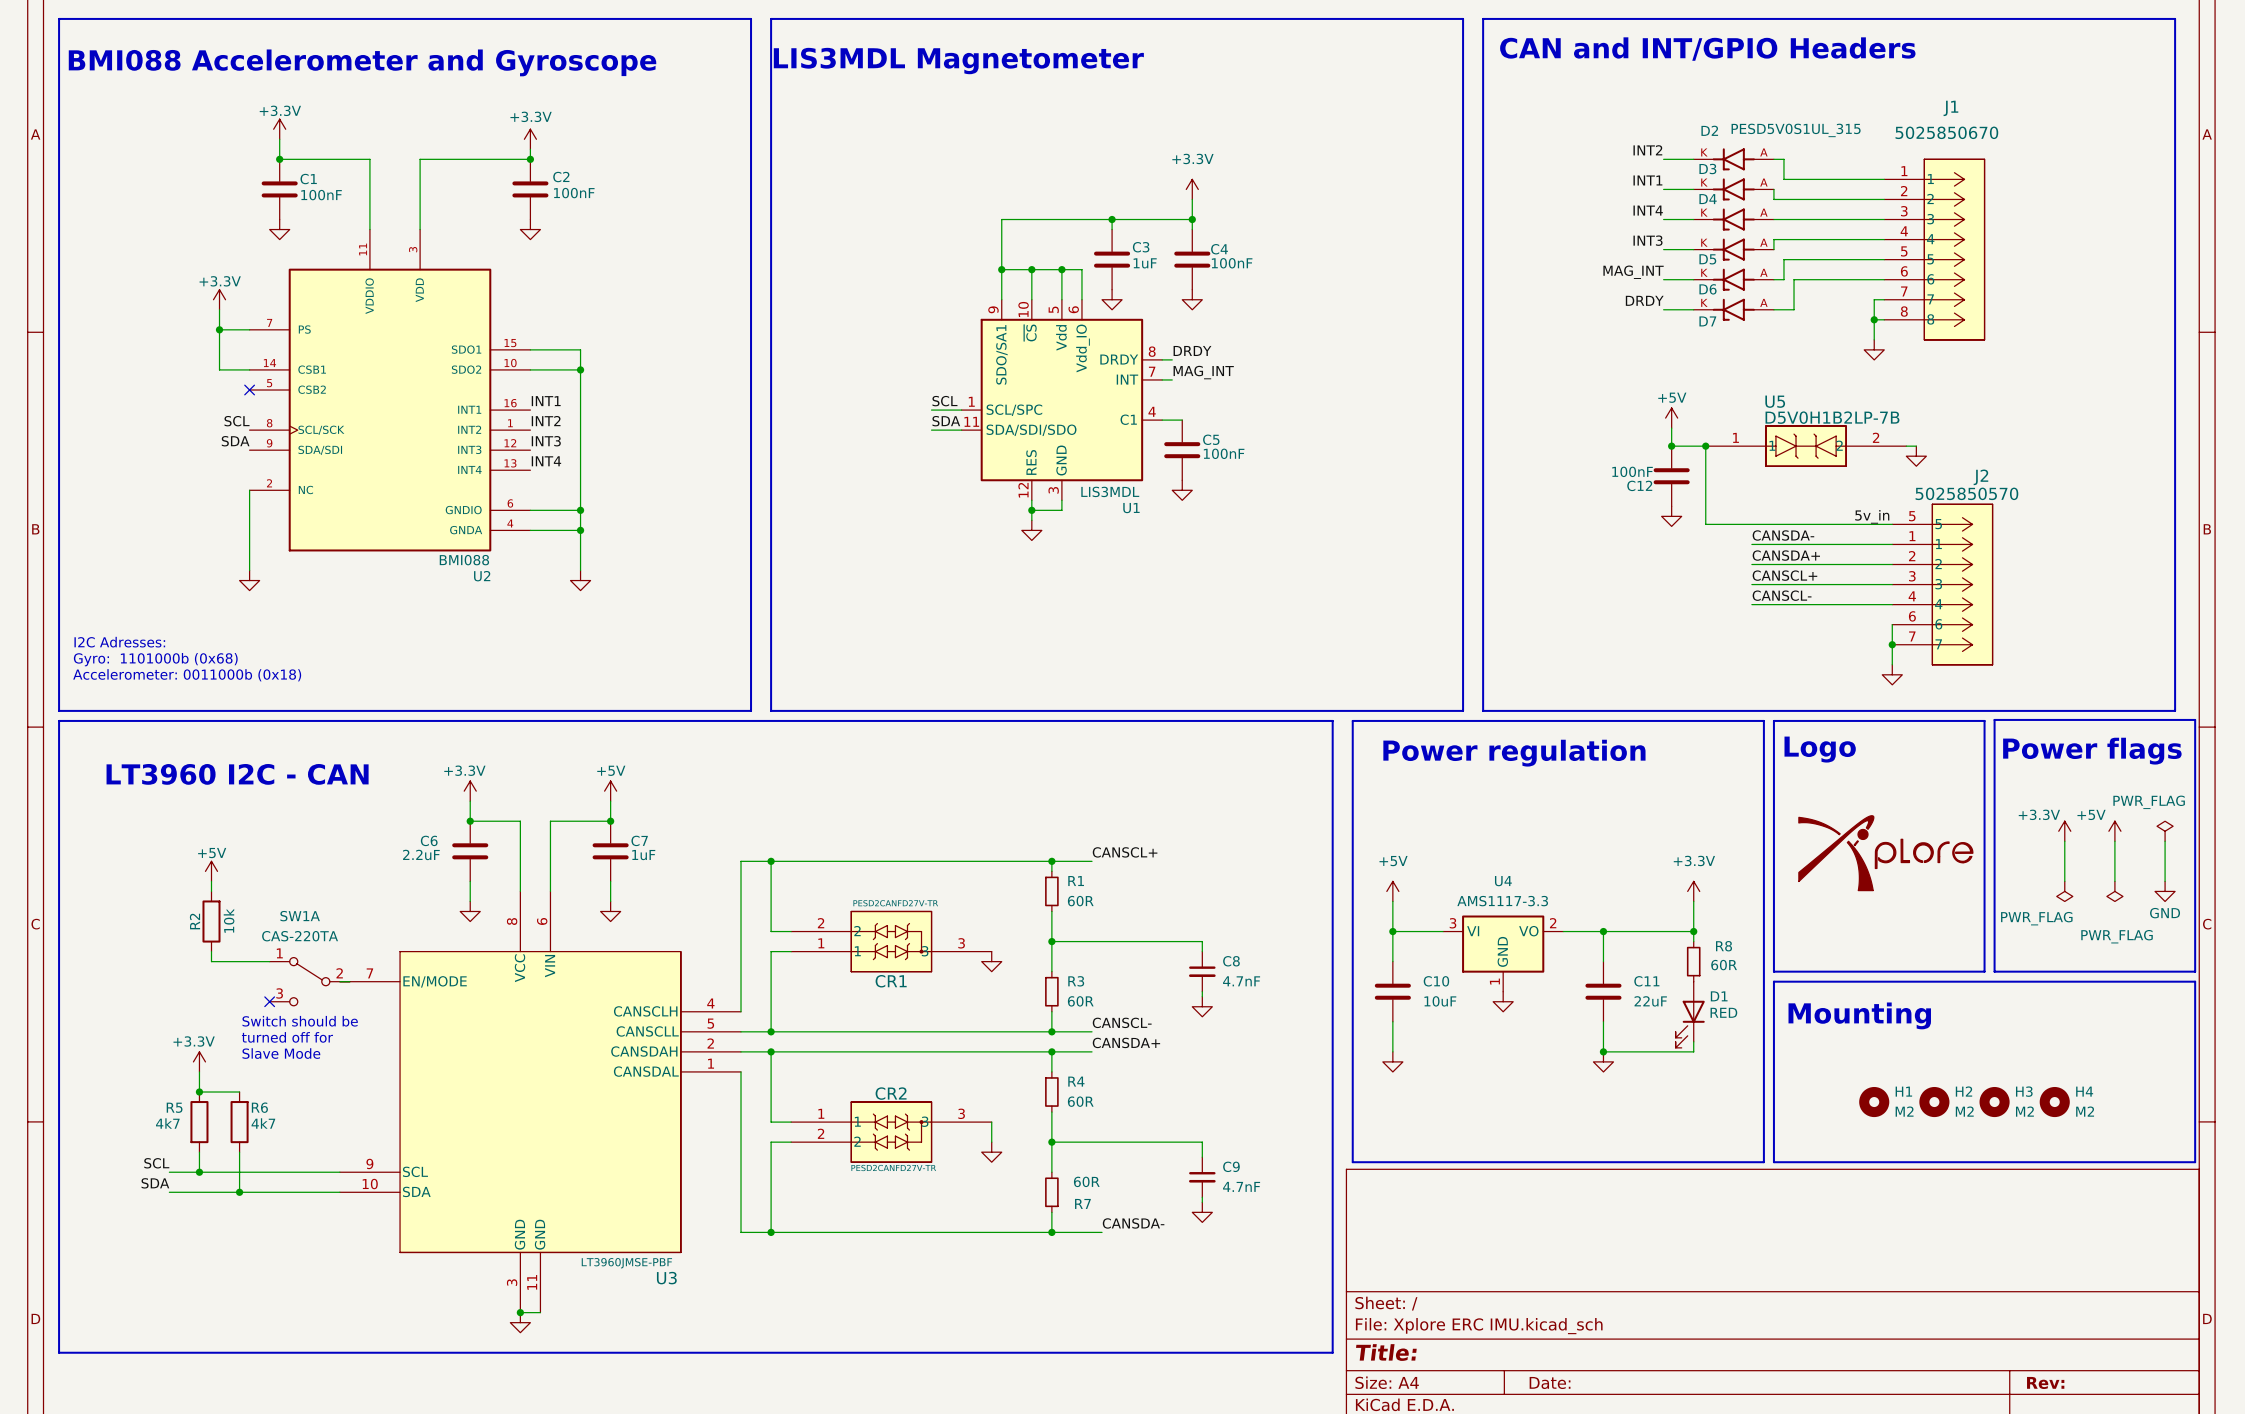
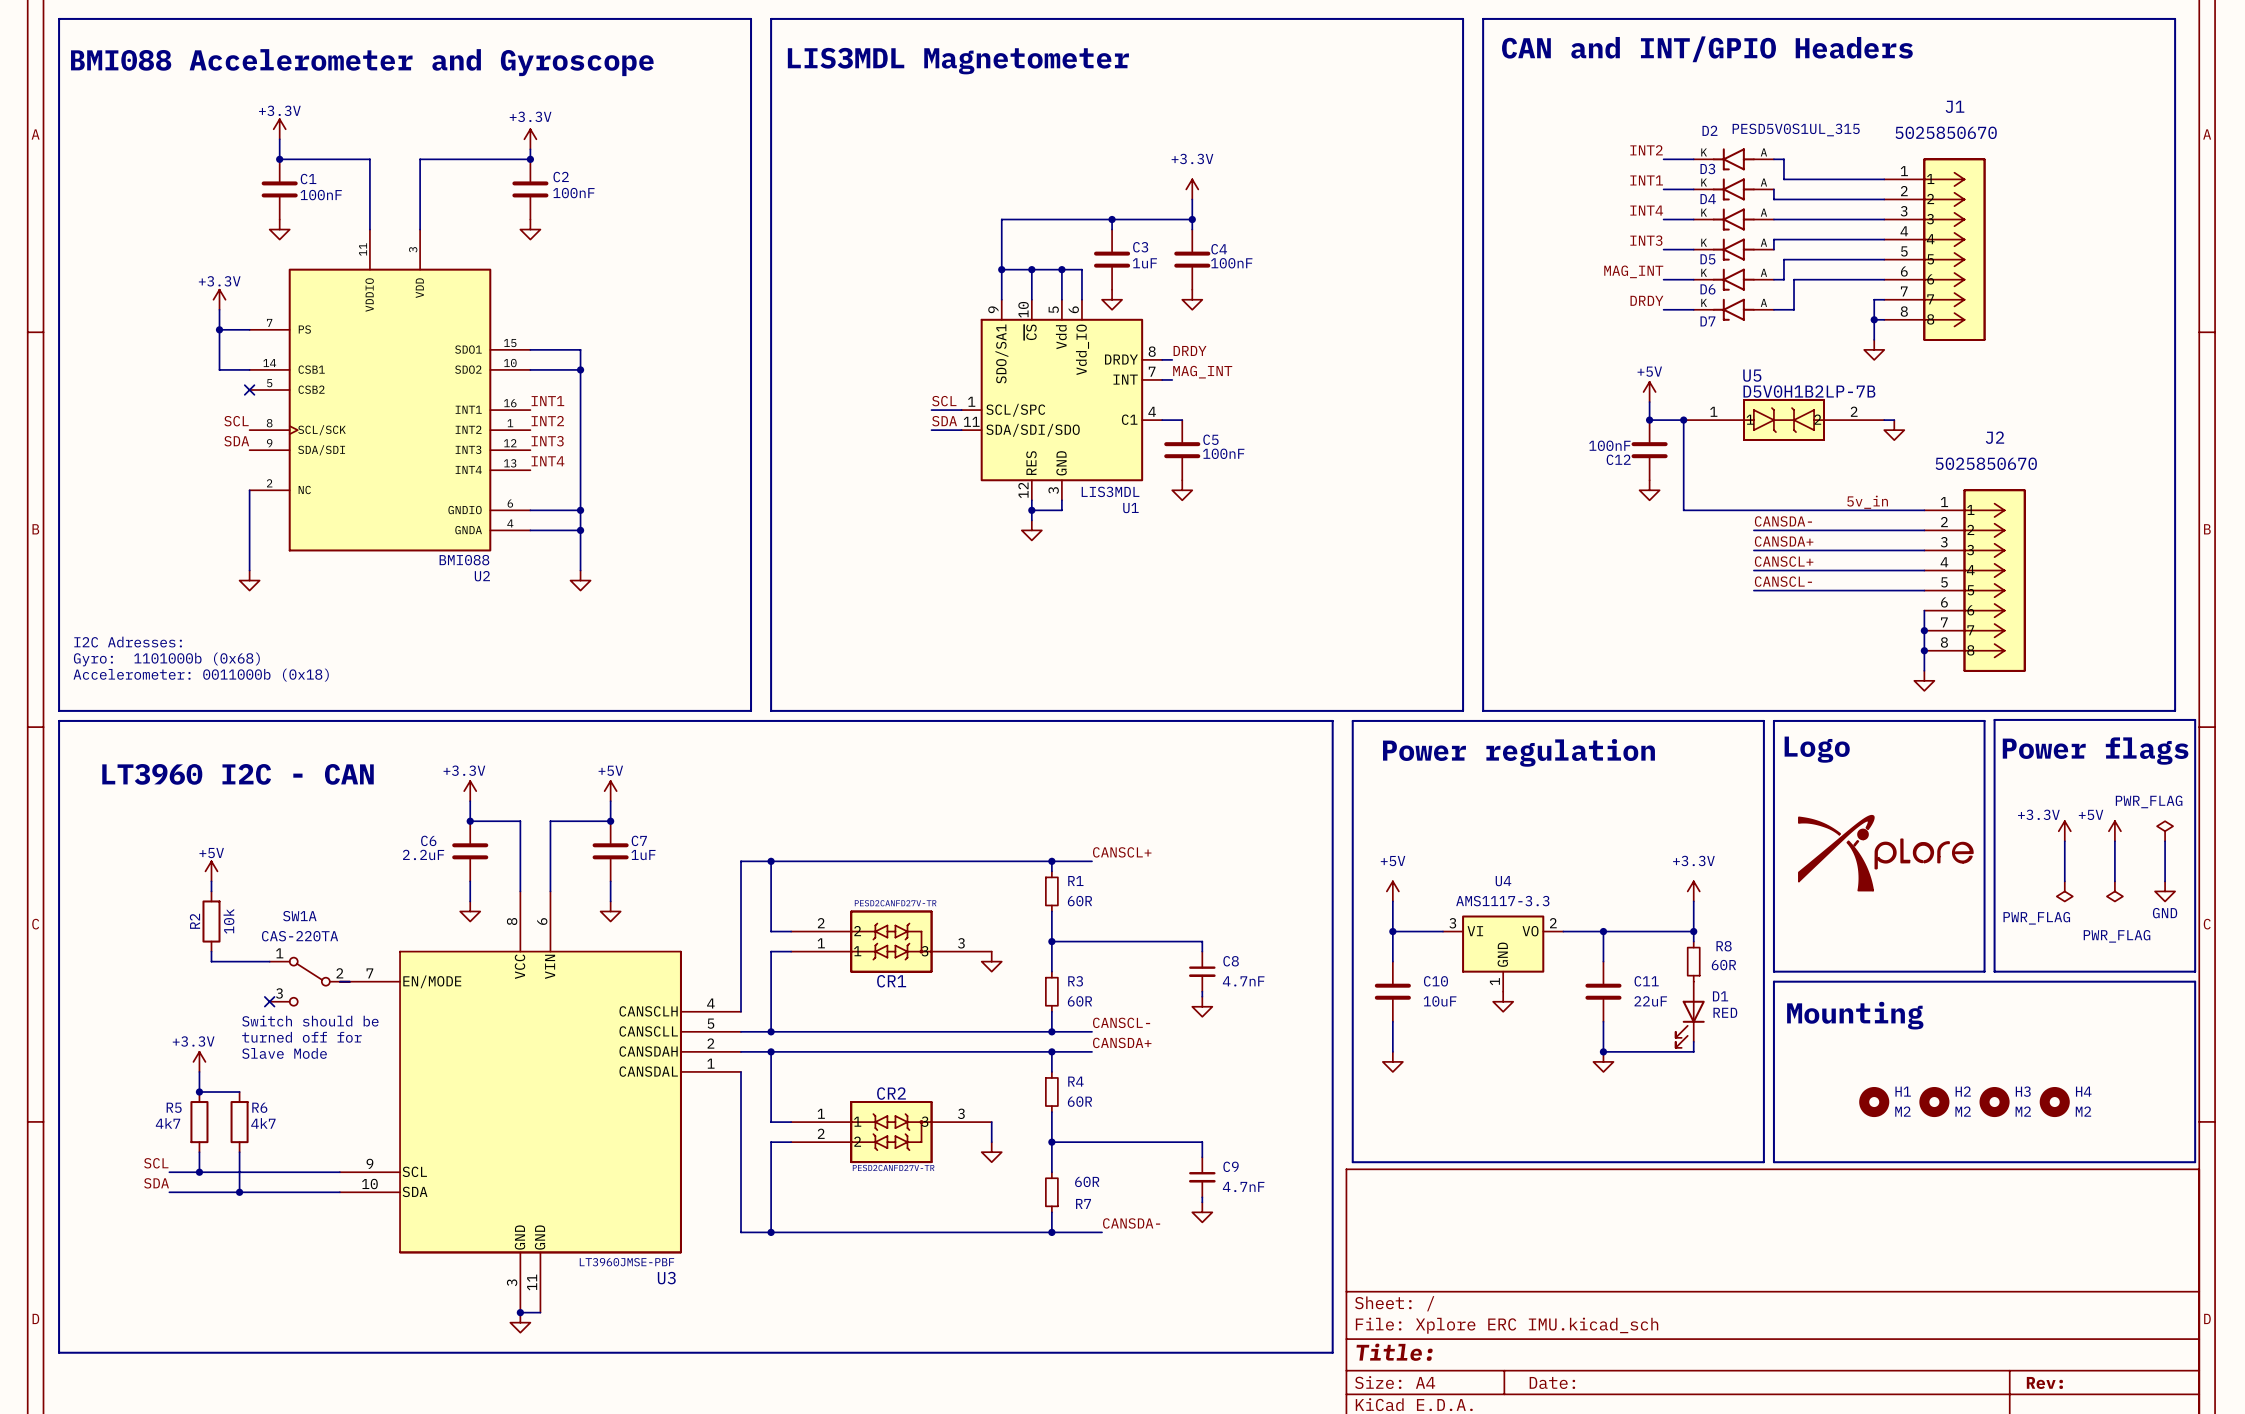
wire: none -> (1649, 402) (1649, 420) (1683, 420) (1683, 510) (1924, 510)
power symbol position: +5V (1671, 418) -> +5V (1649, 392)
junction: none -> (1649, 420)
junction: none -> (1683, 420)
wire: (1671, 428) (1671, 446) (1705, 446) (1705, 524) (1892, 524) -> none
junction: (1671, 446) -> none
junction: (1705, 446) -> none
U5 position: (1806, 446) -> (1783, 420)
wire: (1906, 446) (1916, 446) -> (1884, 420) (1894, 420)
power symbol position: (1916, 456) -> (1894, 430)
C12 position: (1671, 476) -> (1649, 450)
J2 name position: J2 (1980, 477) -> J2 (1994, 437)
J2 value: 5025850570 (1966, 493) -> 5025850670 (1986, 463)
J2 symbol: [1892, 503, 1994, 666] -> [1924, 489, 2026, 672]
power symbol position: (1671, 516) -> (1649, 490)
label position: 5v_in (1872, 516) -> 5v_in (1867, 502)
wire: none -> (1753, 530) (1924, 530)
label position: CANSDA- (1783, 535) -> CANSDA- (1783, 521)
wire: (1751, 544) (1892, 544) -> none
wire: none -> (1753, 550) (1924, 550)
label position: CANSDA+ (1786, 555) -> CANSDA+ (1784, 541)
wire: (1751, 564) (1892, 564) -> none
wire: none -> (1753, 570) (1924, 570)
label position: CANSCL+ (1784, 575) -> CANSCL+ (1784, 561)
wire: (1751, 584) (1892, 584) -> none
wire: none -> (1753, 590) (1924, 590)
label position: CANSCL- (1782, 595) -> CANSCL- (1783, 581)
wire: (1751, 604) (1892, 604) -> none
wire: none -> (1924, 610) (1924, 670)
wire: (1892, 624) (1892, 664) -> none
junction: none -> (1924, 630)
junction: (1892, 644) -> none
junction: none -> (1924, 650)
power symbol position: (1892, 674) -> (1924, 680)

